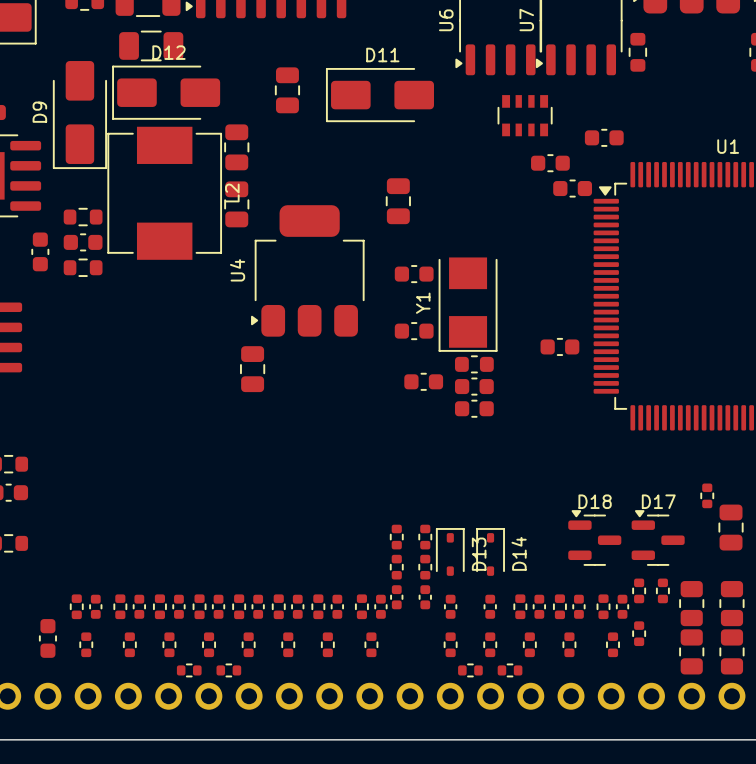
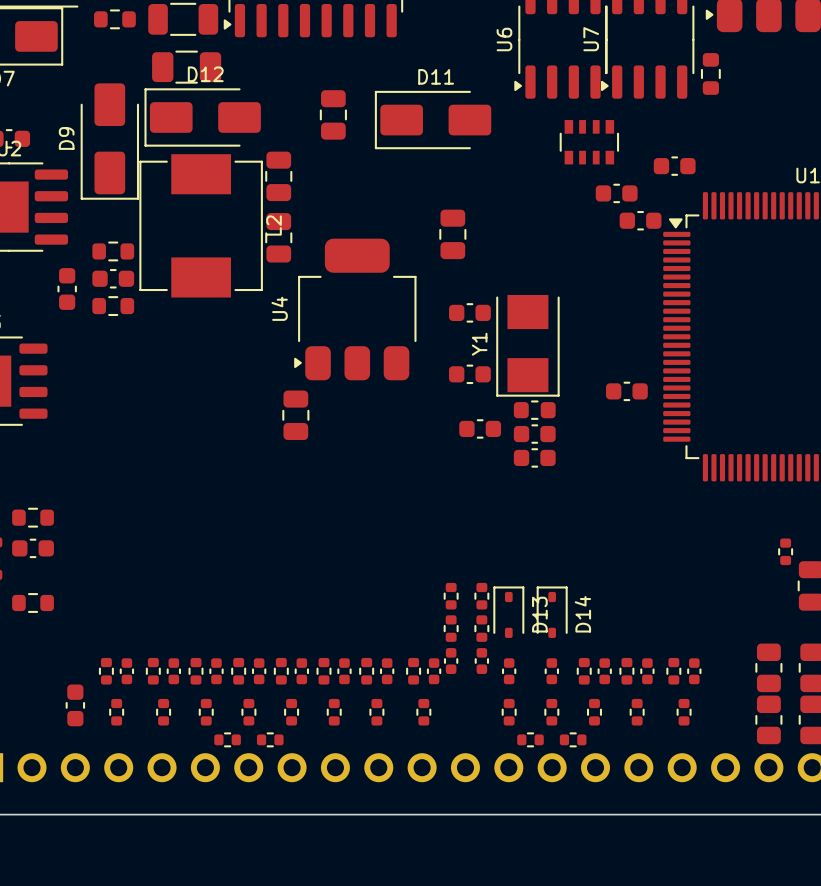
D18: (594, 538) -> none
D17: (658, 538) -> none
part: (639, 590) -> none
part: (662, 590) -> none
part: (639, 633) -> none

